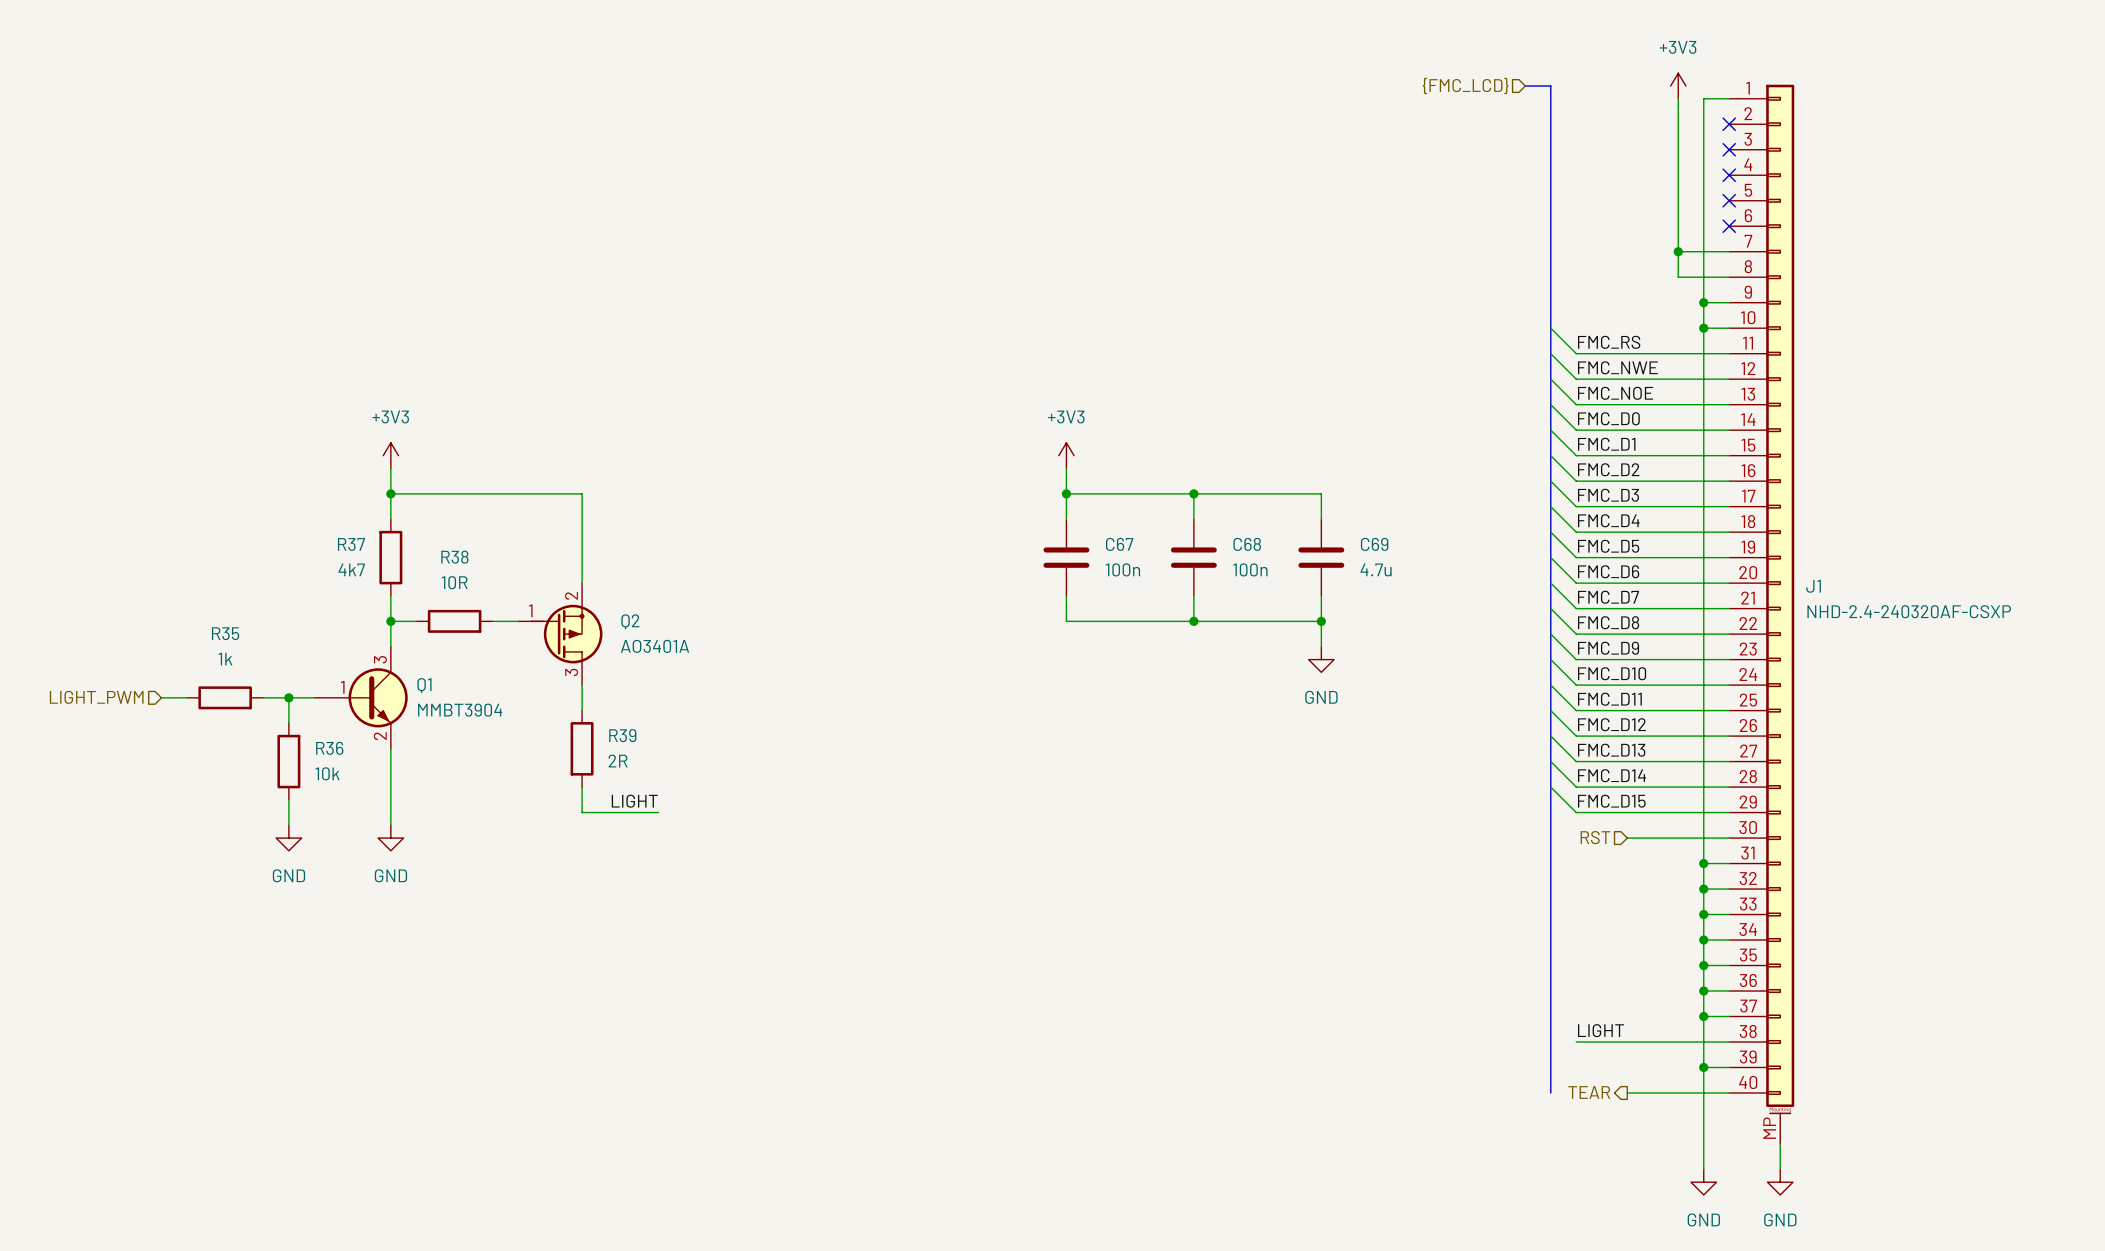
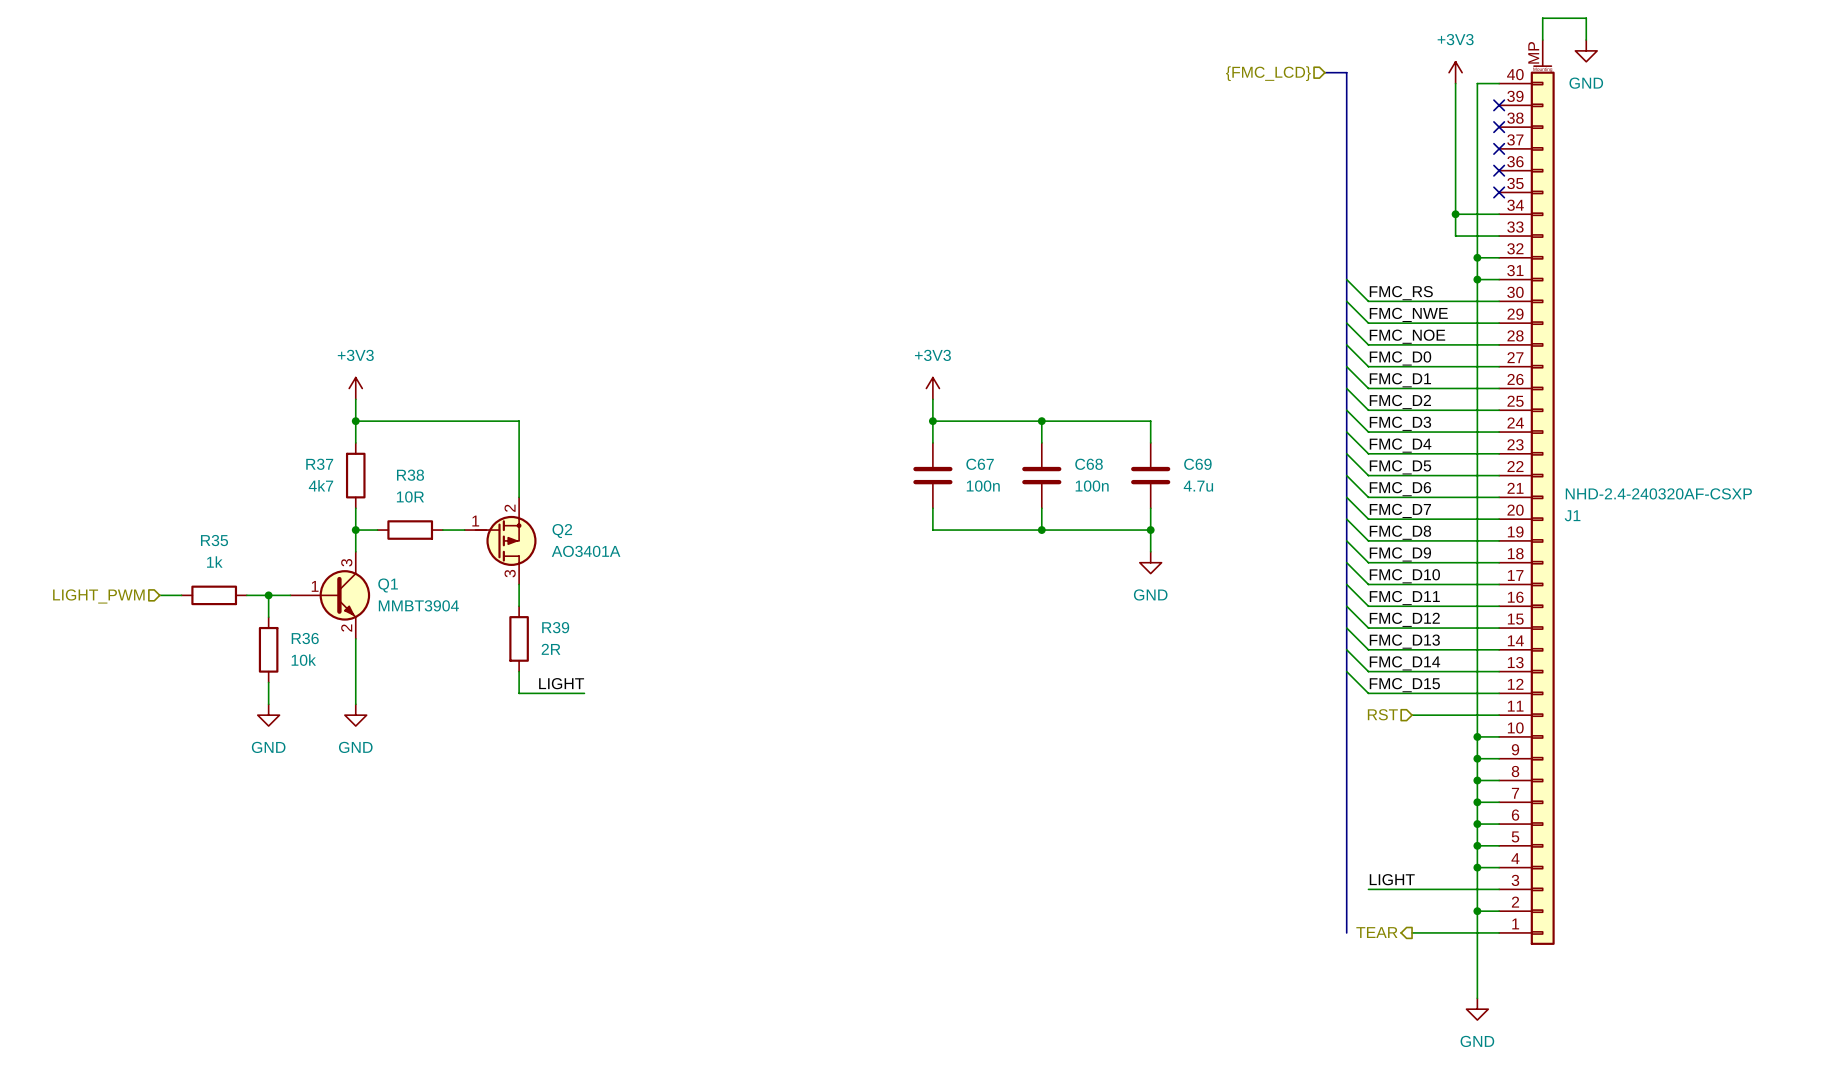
wire: none -> (1542, 40) (1542, 18) (1586, 18) (1586, 40)
power symbol: none -> GND (1586, 50)
J1 flip: as is (1780, 599) -> up-down (1542, 505)
wire: (1780, 1143) (1780, 1169) -> none
power symbol: GND (1780, 1182) -> none

